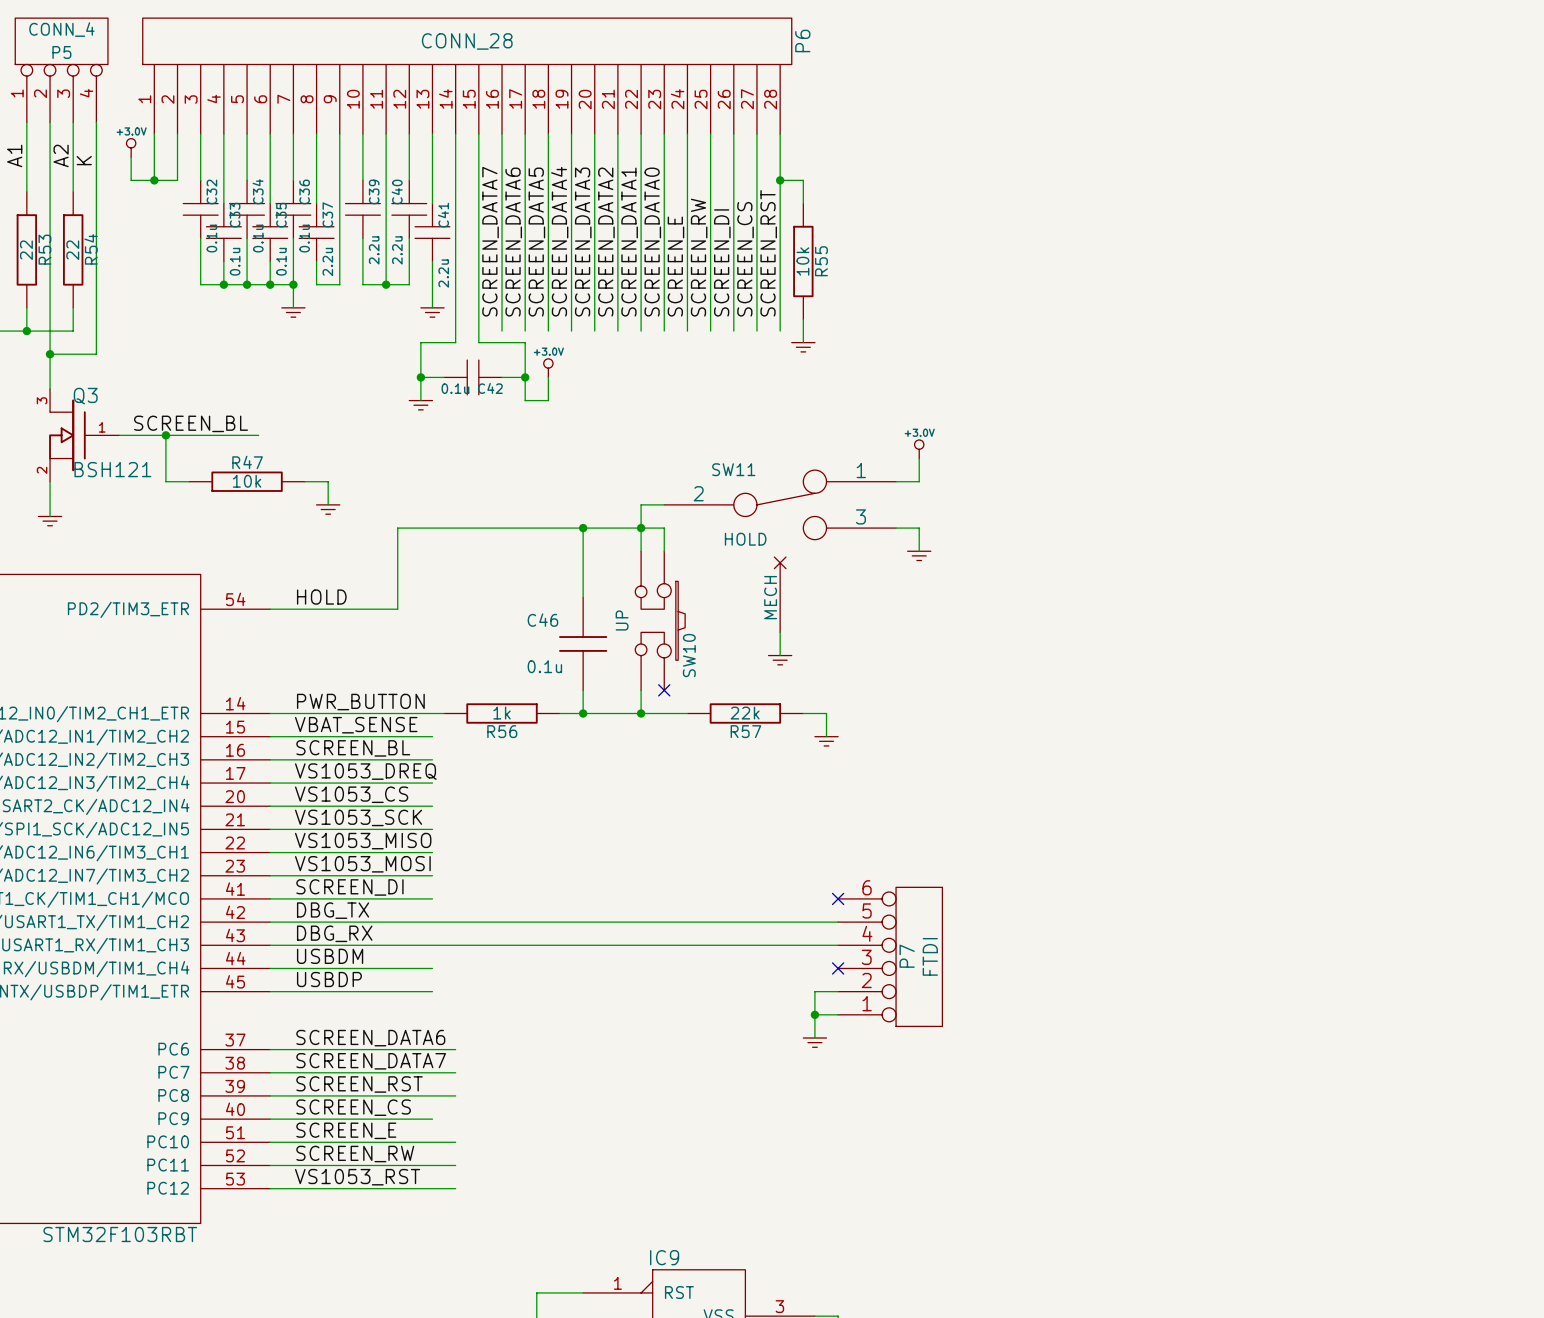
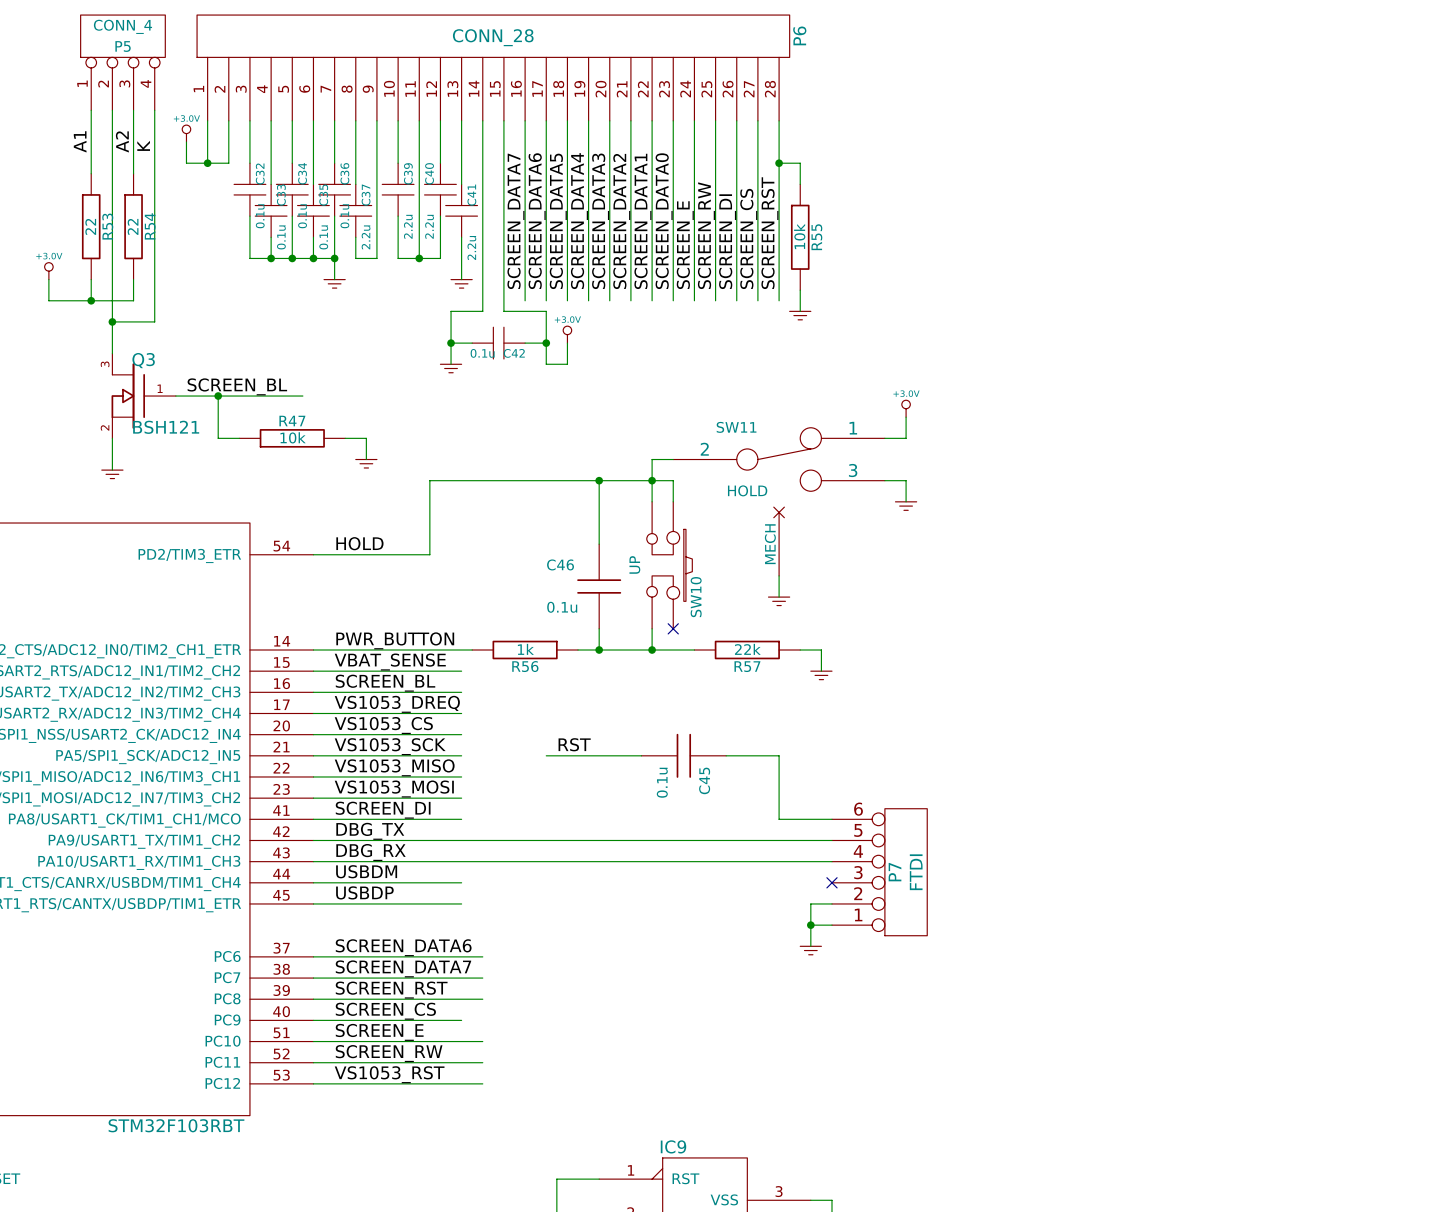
label: none -> RST (574, 744)
wire: none -> (546, 755) (641, 755)
C45: none -> 0.1u (683, 755)
wire: none -> (726, 755) (779, 755) (779, 819) (831, 819)
no-connect mark: (838, 898) -> none

